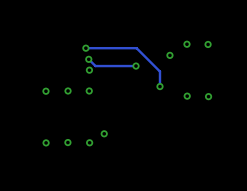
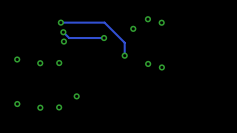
via: none -> (147, 19)
via: none -> (60, 22)
via: (208, 44) -> none
track: (85, 48) (136, 48) (159, 71) (159, 86) -> (60, 22) (104, 22) (124, 42) (124, 55)
via: (85, 48) -> none
via: none -> (133, 28)
via: none -> (63, 32)
via: (169, 55) -> none
track: (88, 59) (95, 66) (136, 66) -> (63, 32) (69, 38) (104, 38)
via: (88, 59) -> none
via: none -> (104, 38)
via: none -> (63, 41)
via: (136, 66) -> none
via: (89, 70) -> none
via: none -> (124, 55)
via: none -> (17, 59)
via: (159, 86) -> none
via: (89, 90) -> none
via: none -> (148, 63)
via: (208, 96) -> none
via: none -> (76, 96)
via: (104, 133) -> none
via: none -> (17, 104)
via: (89, 142) -> none

